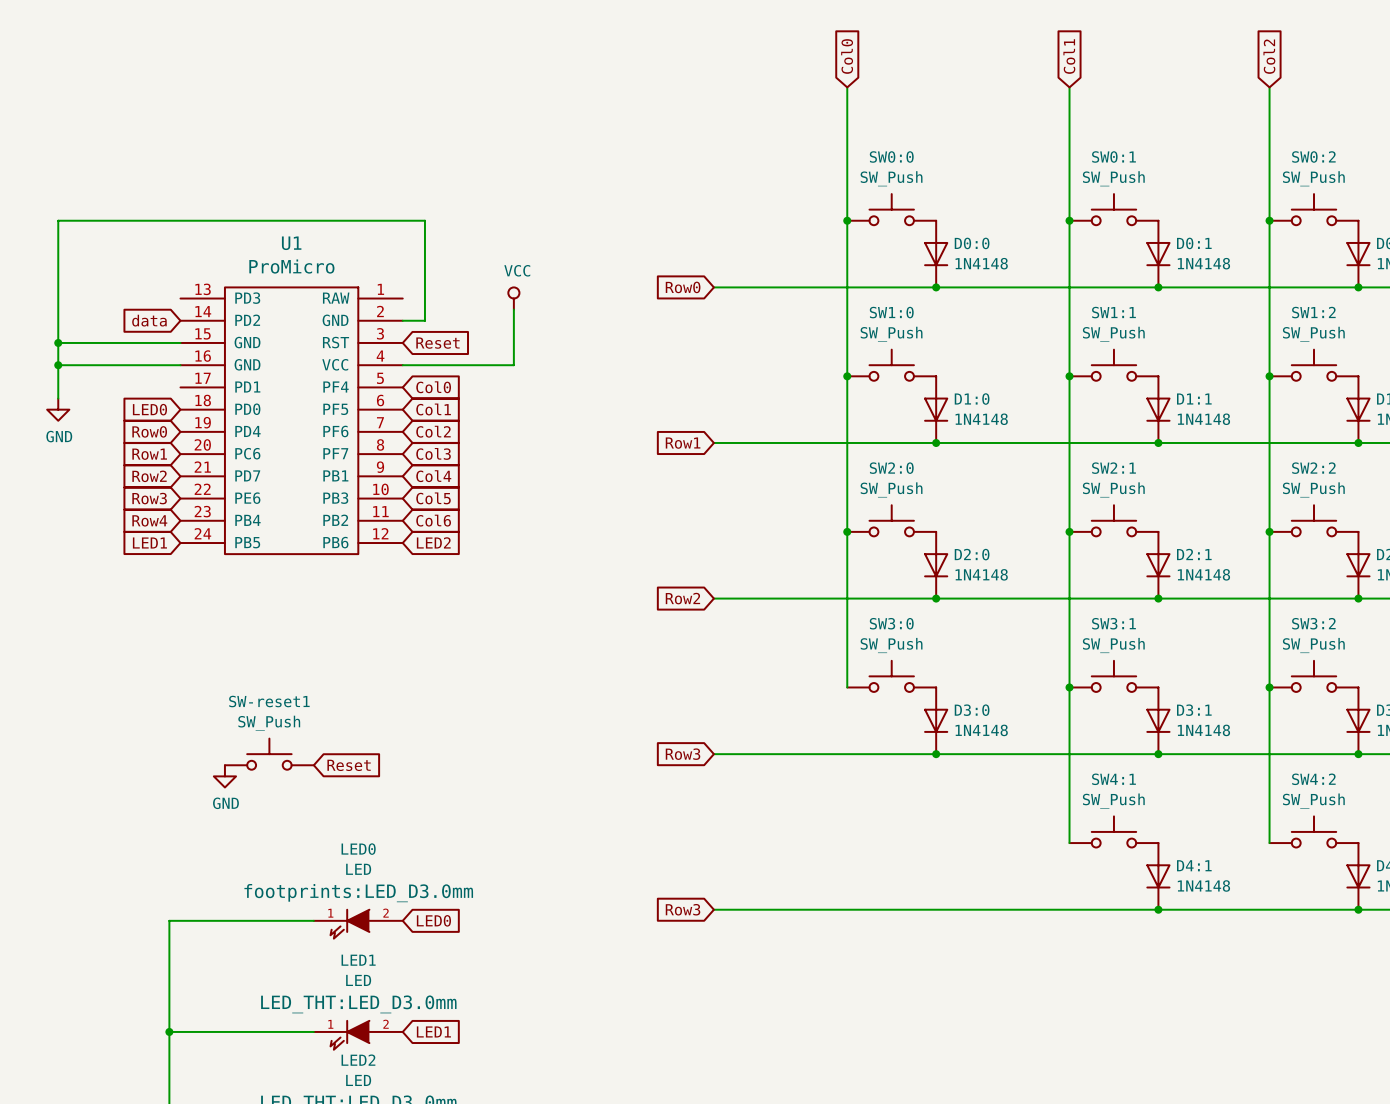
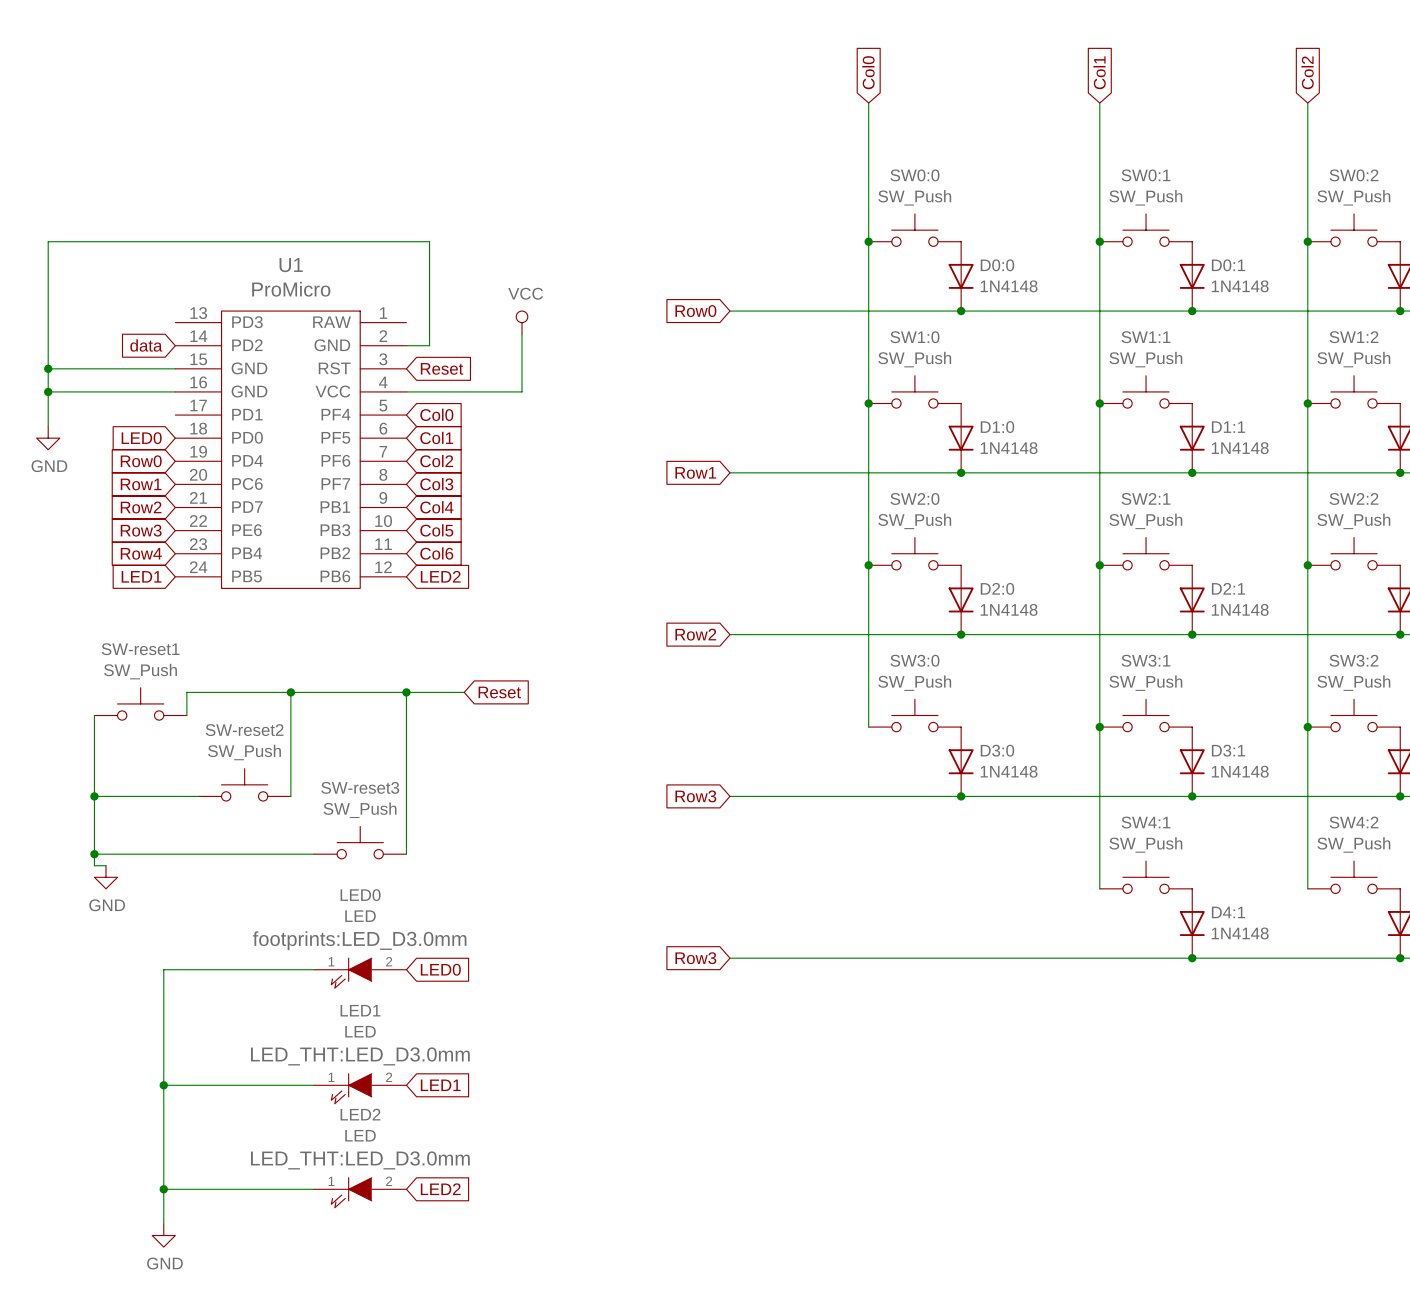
wire: none -> (290, 692) (290, 796)
junction: none -> (290, 692)
wire: none -> (406, 692) (406, 854)
junction: none -> (406, 692)
wire: none -> (464, 692) (186, 692) (186, 715)
wire: none -> (94, 715) (94, 865) (105, 865)
SW-reset2: none -> SW_Push (244, 784)
wire: none -> (94, 796) (198, 796)
junction: none -> (94, 796)
SW-reset1 position: (269, 754) -> (140, 703)
global label position: Reset (349, 765) -> Reset (499, 692)
power symbol position: GND (224, 776) -> GND (105, 877)
SW-reset3: none -> SW_Push (360, 842)
wire: none -> (94, 854) (314, 854)
junction: none -> (94, 854)

